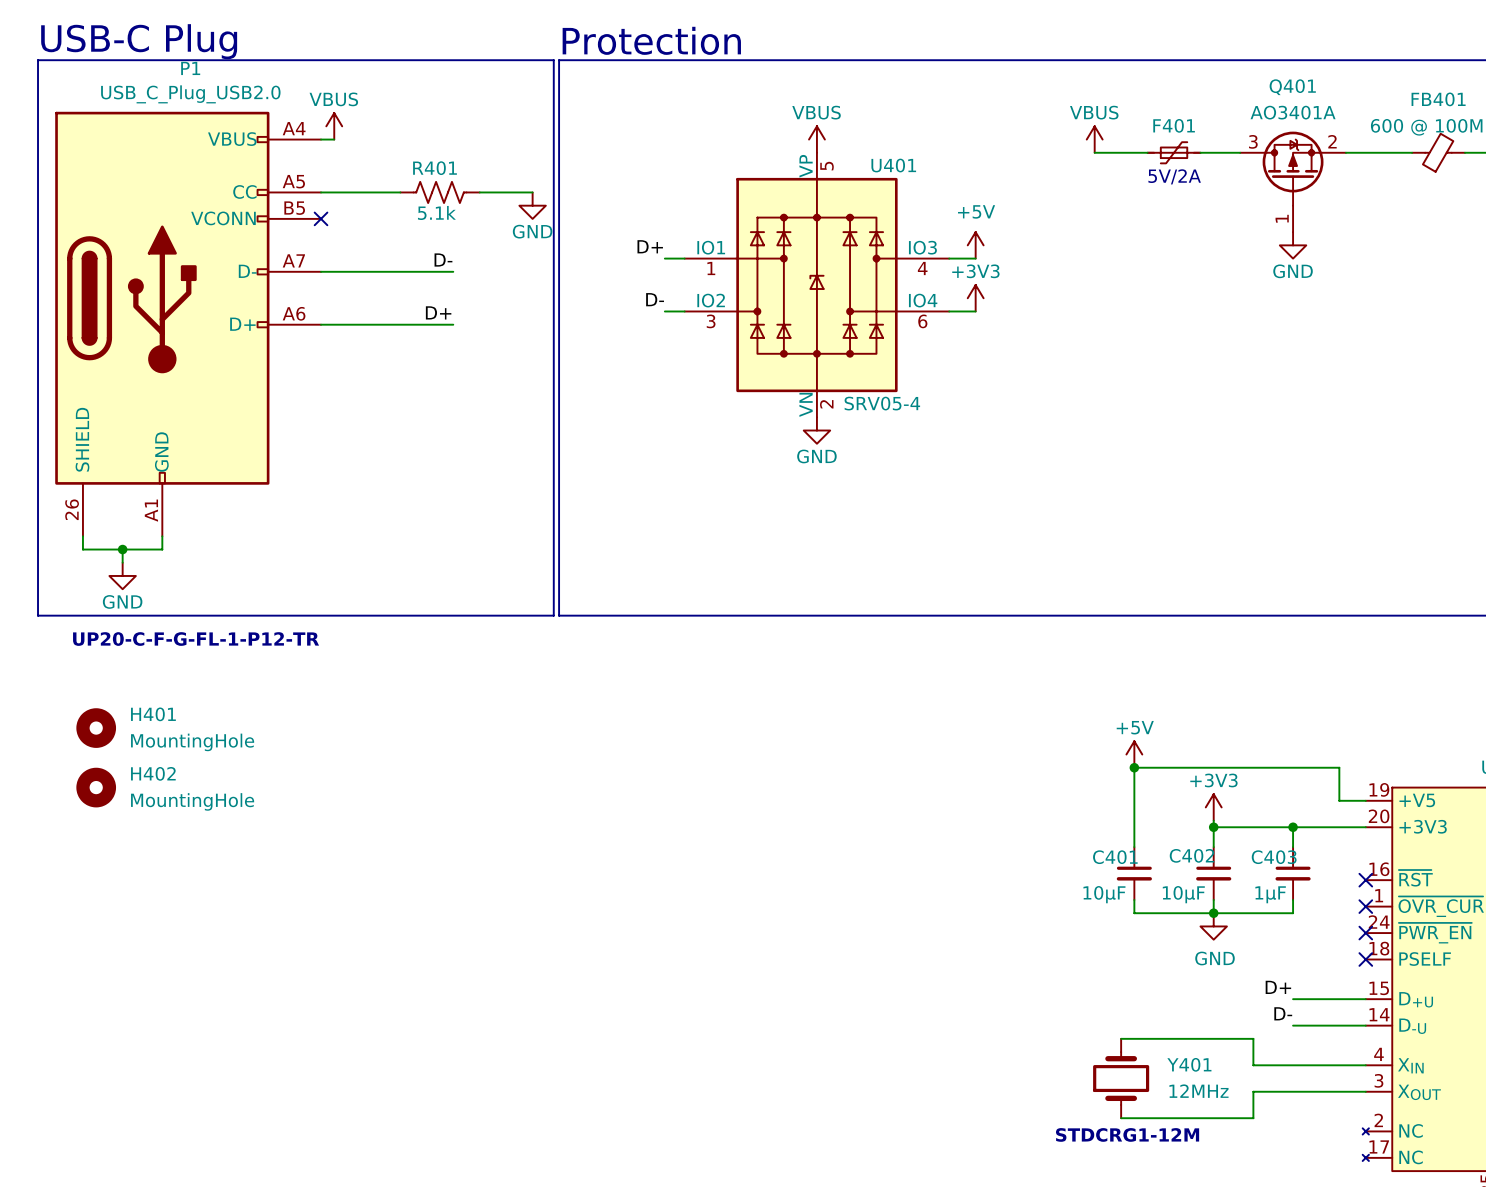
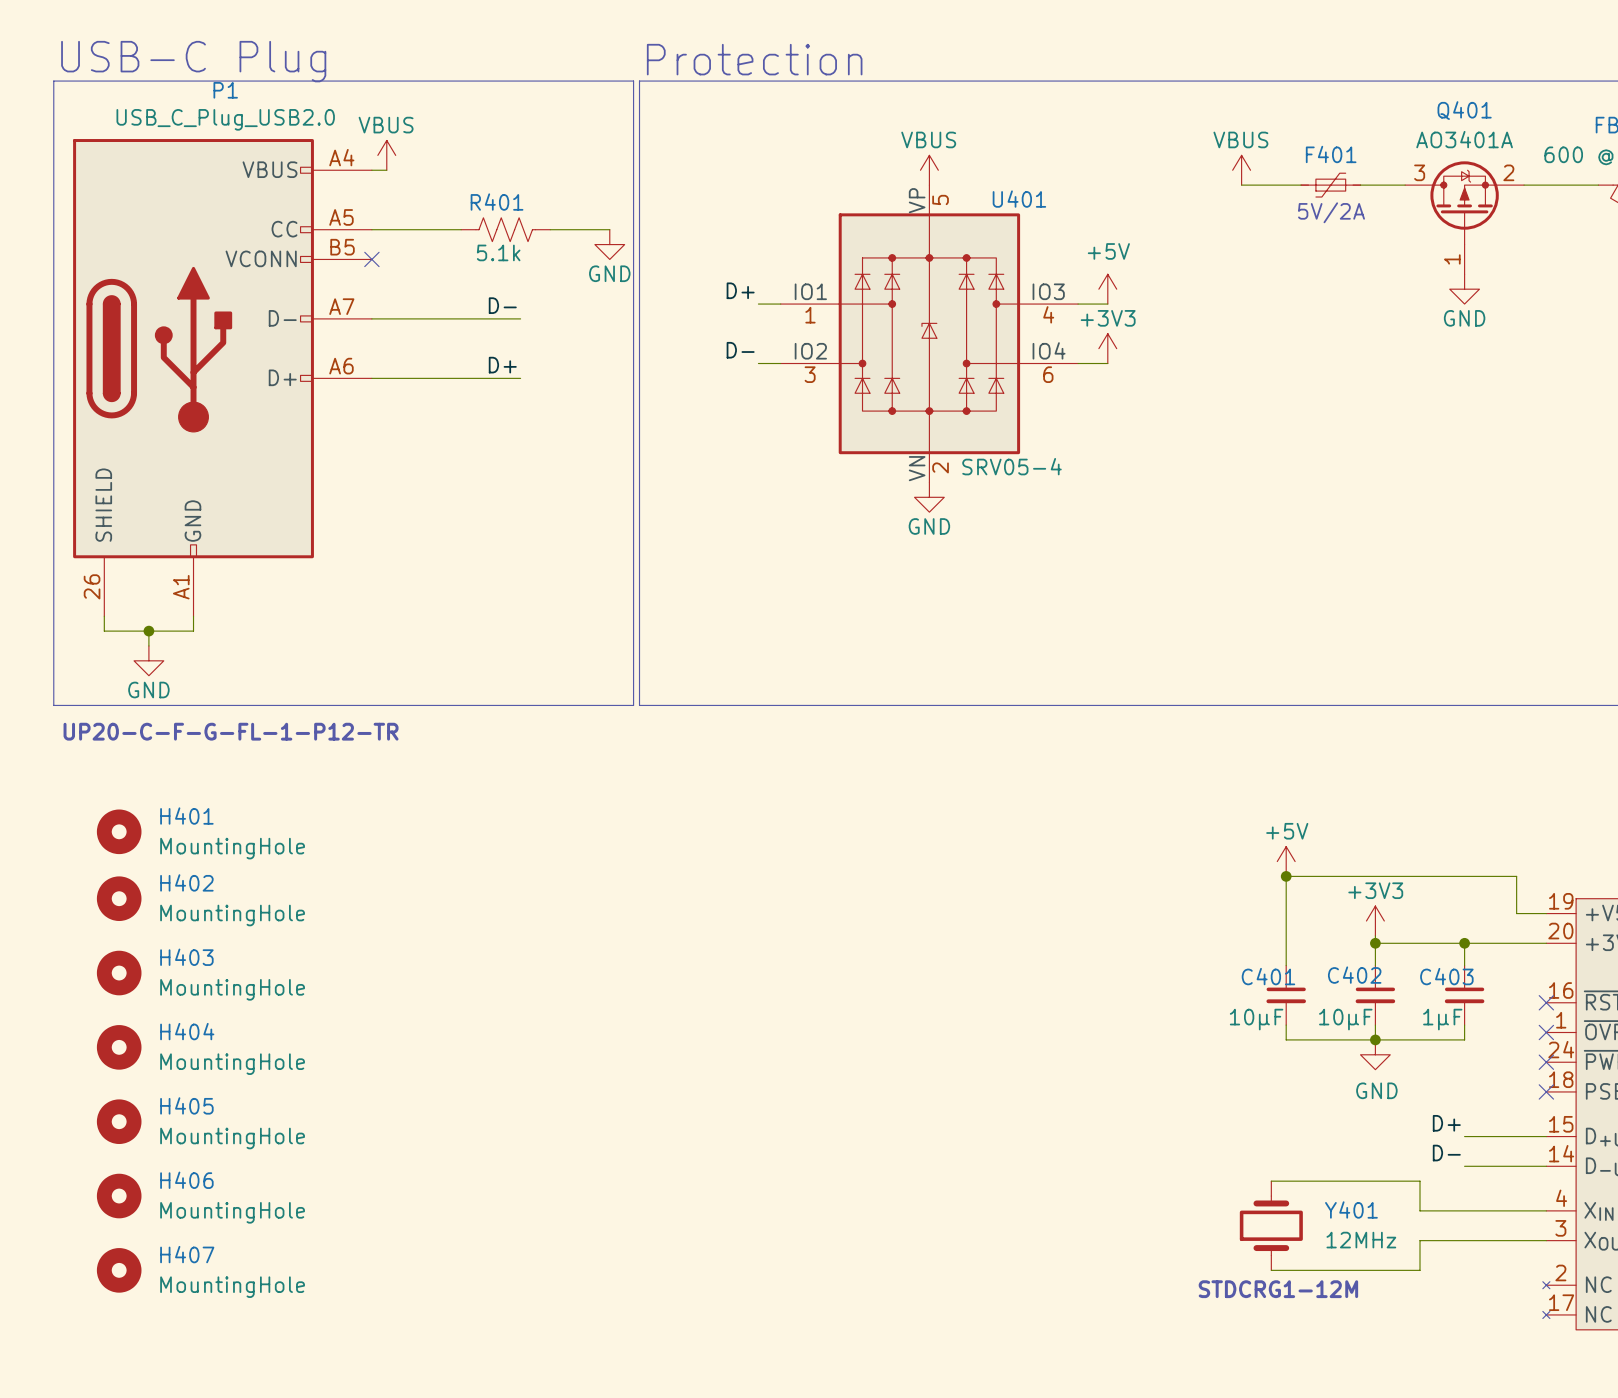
H403: none -> MountingHole (119, 973)
H404: none -> MountingHole (119, 1047)
H405: none -> MountingHole (119, 1121)
H406: none -> MountingHole (119, 1196)
H407: none -> MountingHole (119, 1270)

